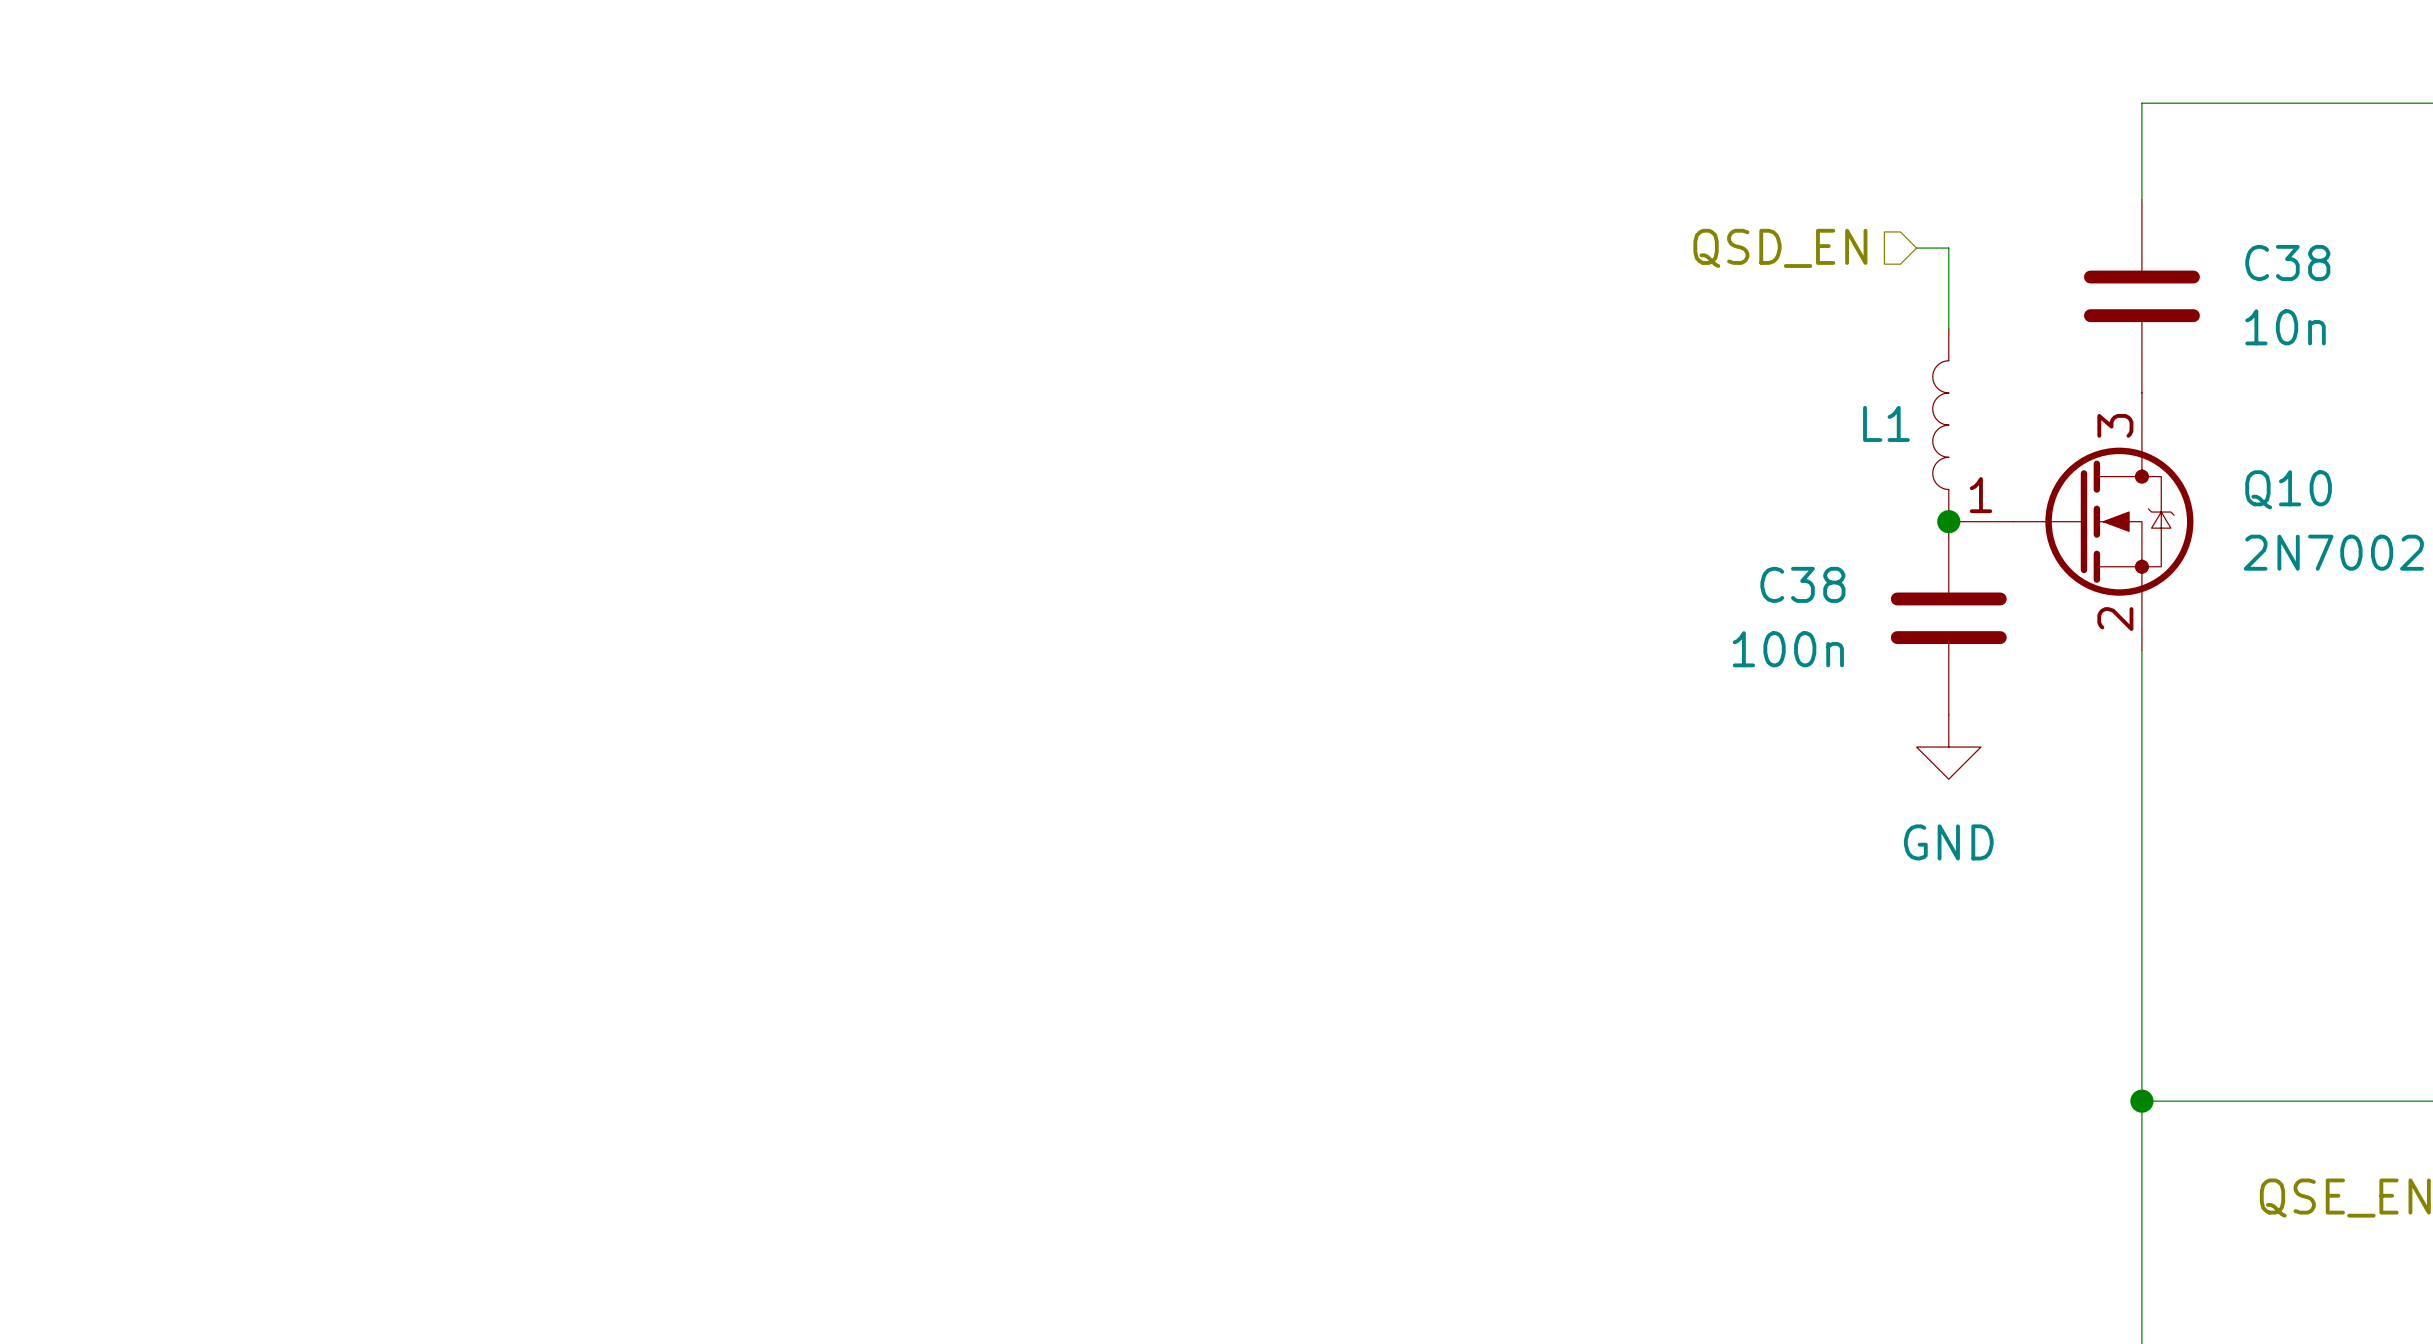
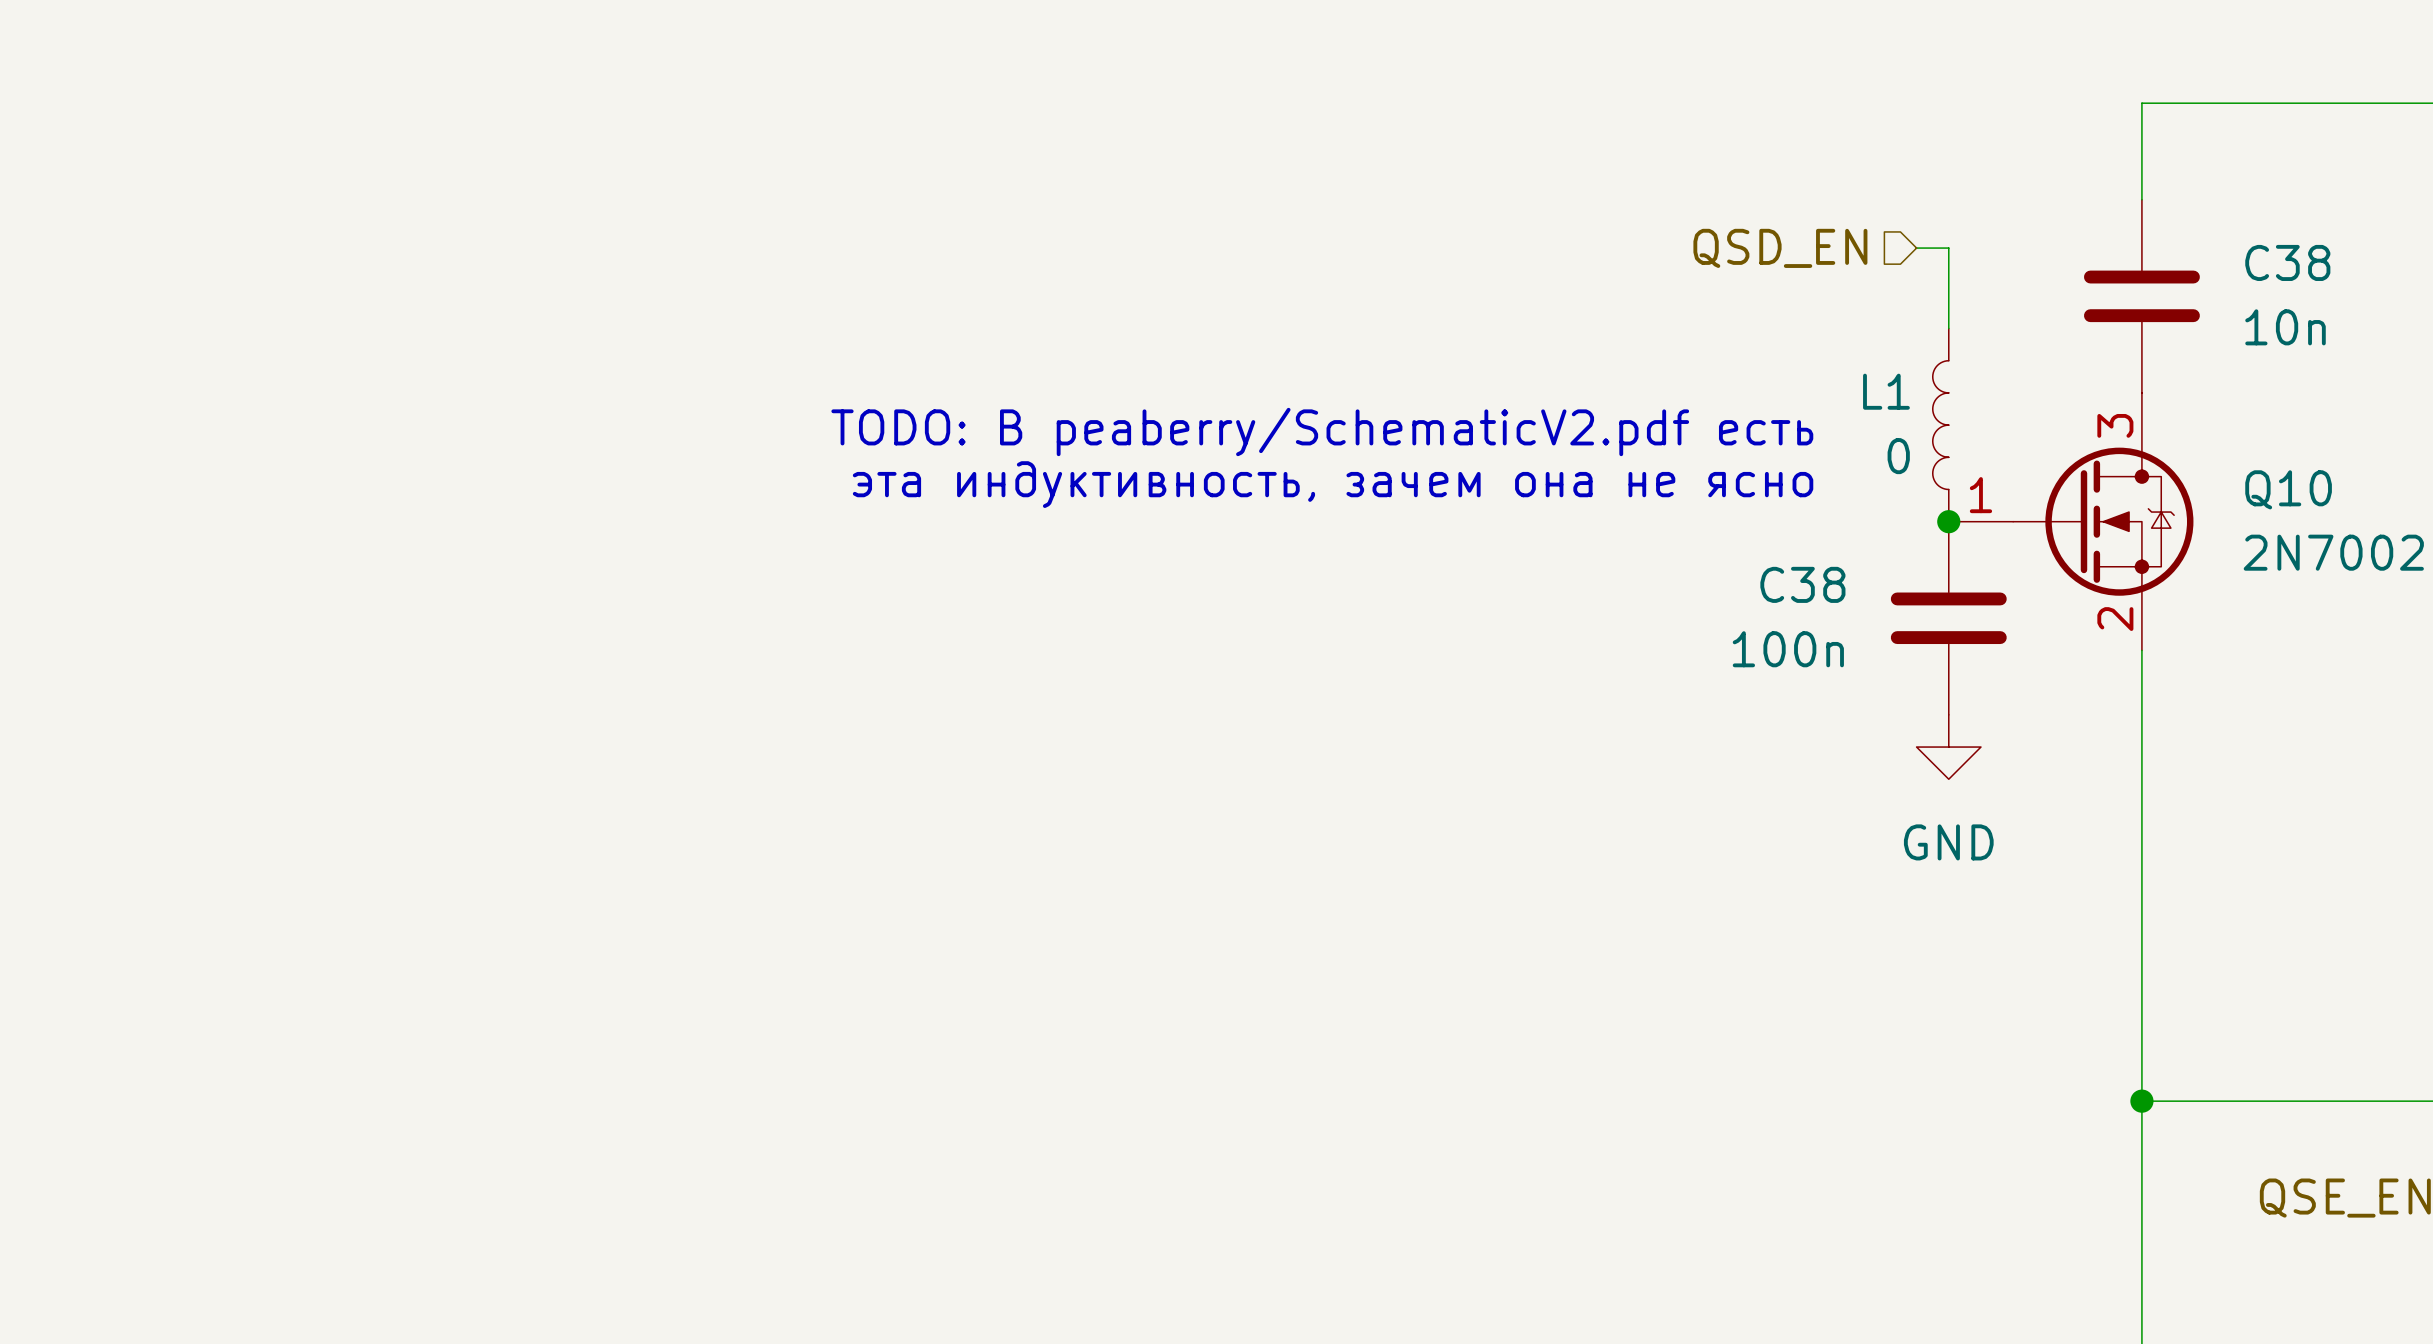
L1 name position: L1 (1886, 423) -> L1 (1886, 391)
text: none -> TODO: В peaberry/SchematicV2.pdf есть (1322, 431)
L1 value: none -> 0 (1898, 456)
text: none -> эта индуктивность, зачем она не ясно (1333, 484)

